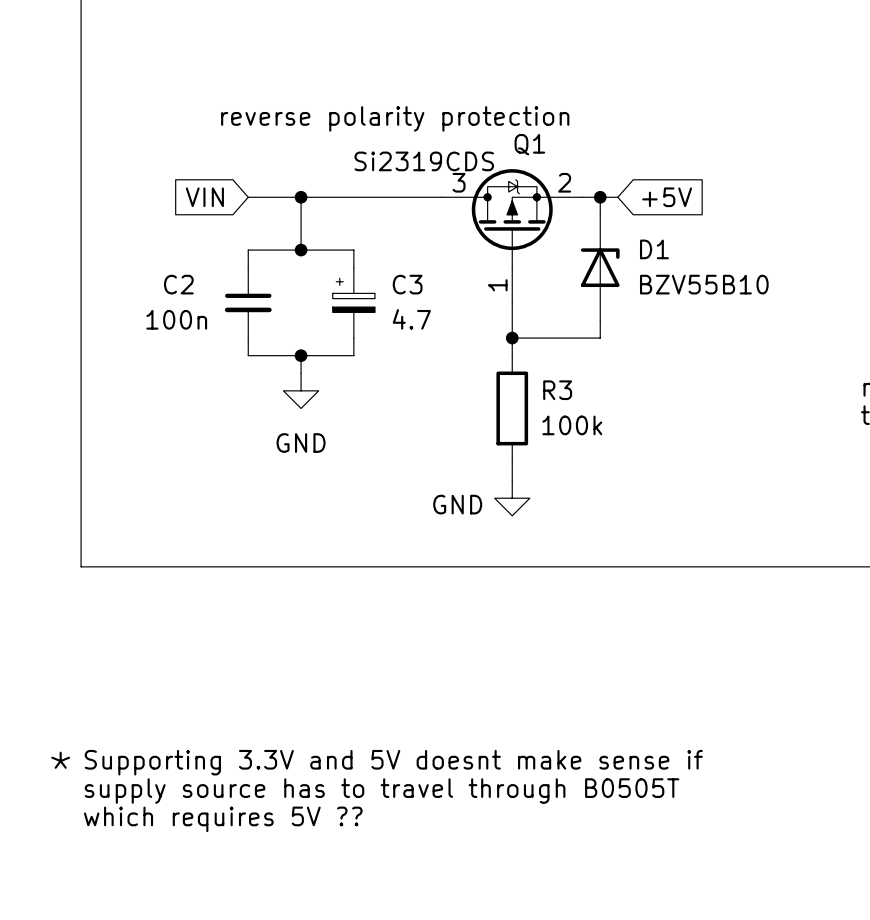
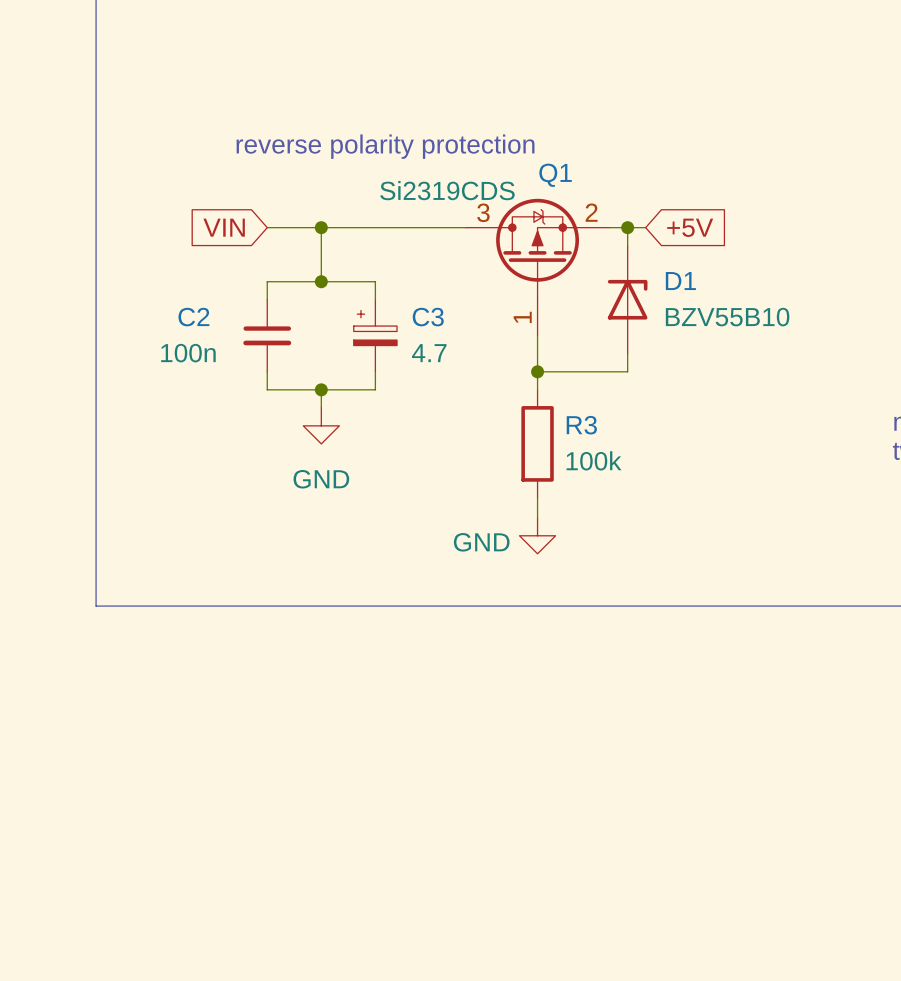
text: * (60, 760) -> none
text: Supporting 3.3V and 5V doesnt make sense if (393, 762) -> none
text: supply source has to travel through B0505T (382, 791) -> none
text: which requires 5V ?? (223, 819) -> none

